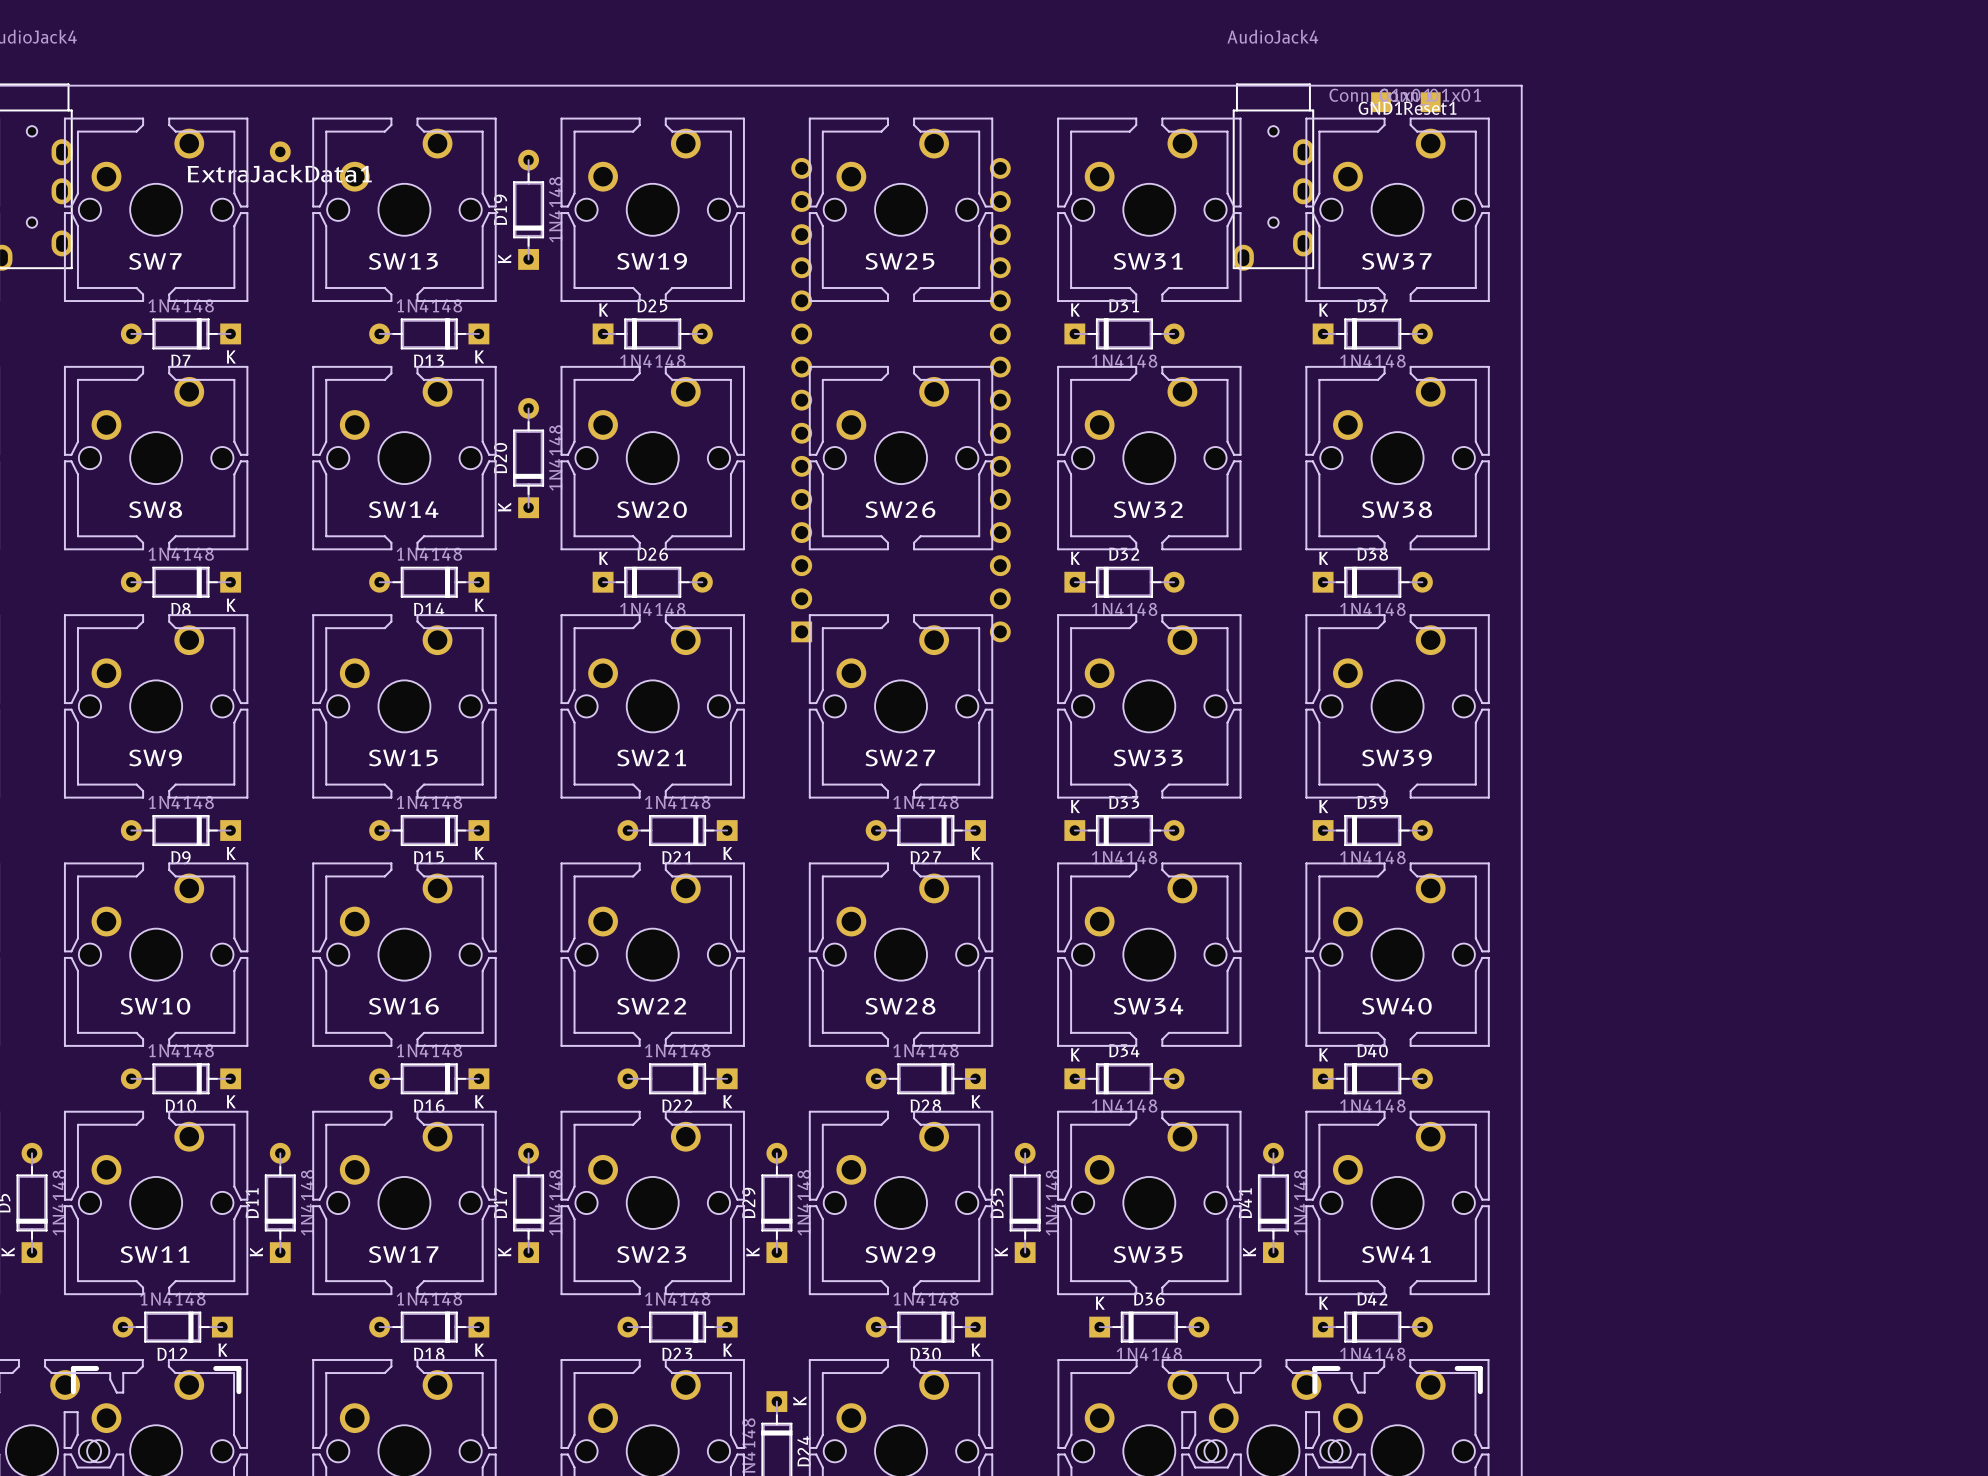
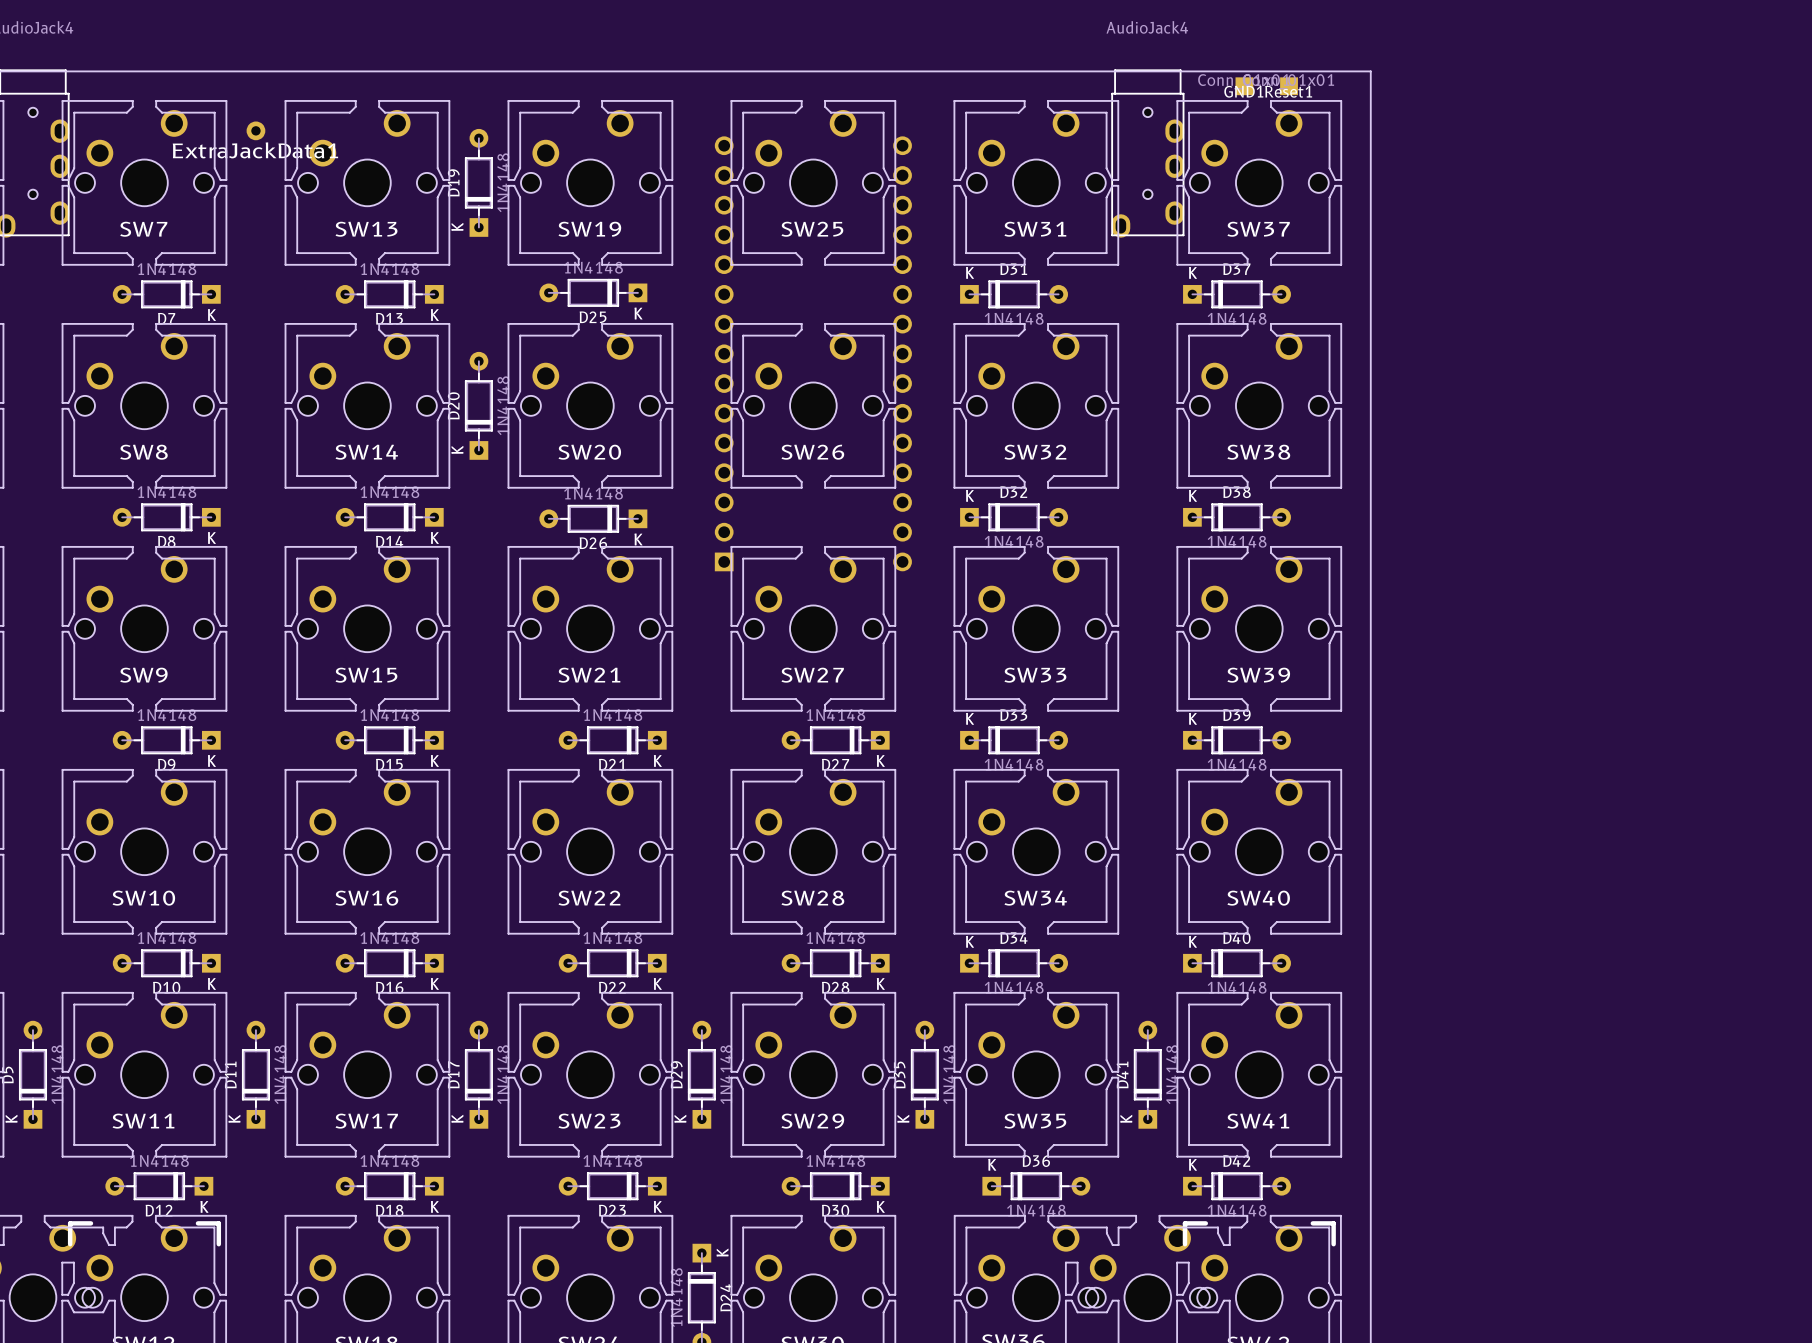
D25 rotation: 0° (652, 333) -> 180° (593, 292)
D26 rotation: 0° (652, 582) -> 180° (593, 518)

